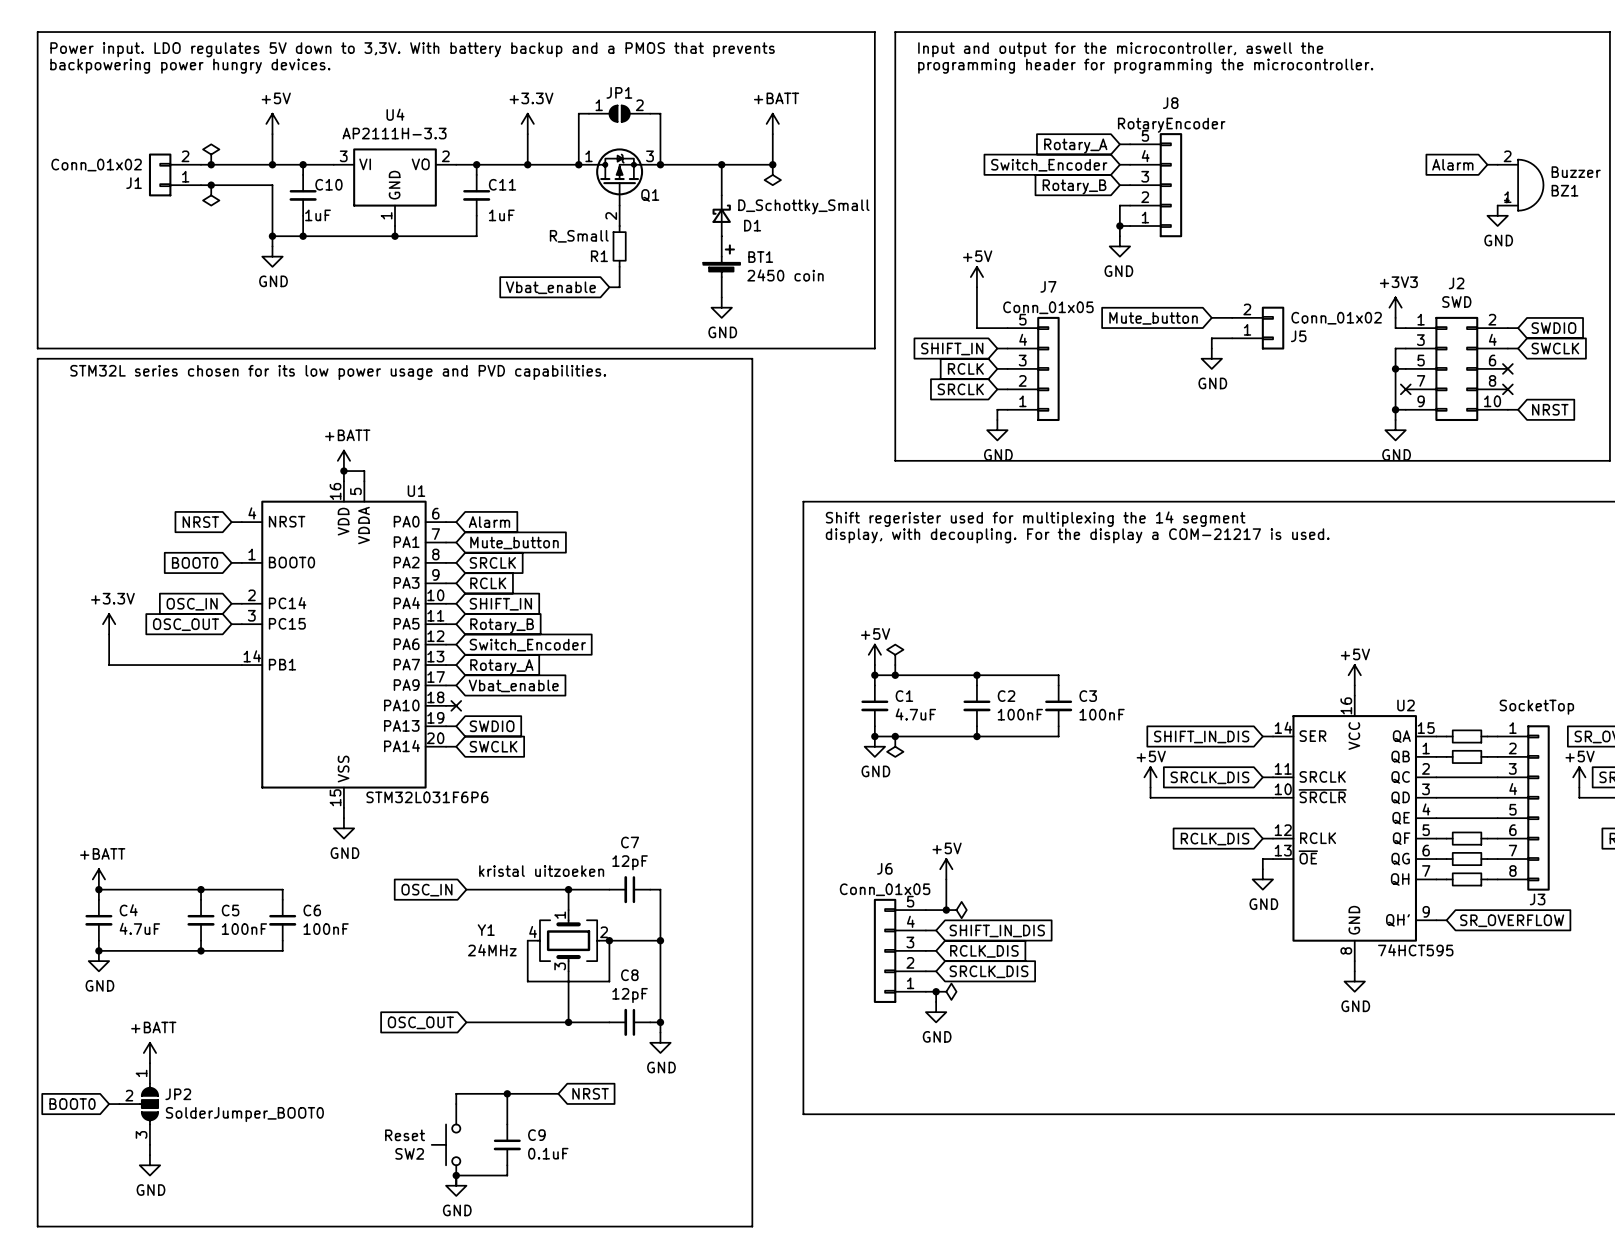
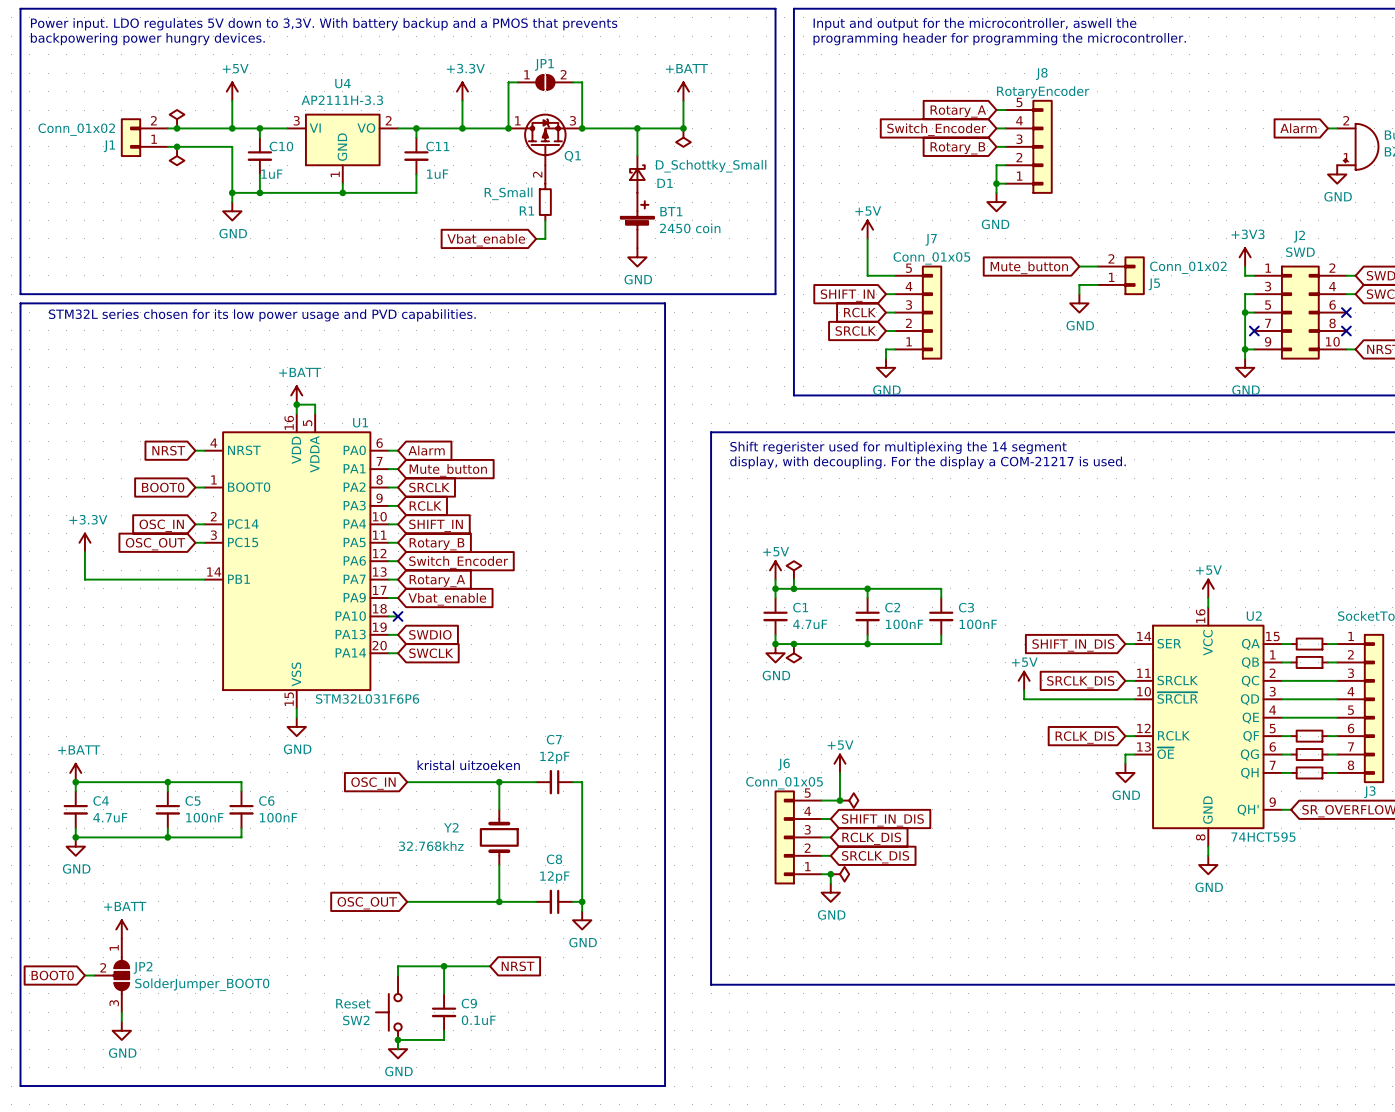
wire: (527, 940) (527, 981) (609, 981) (609, 940) (660, 940) -> none
Y1: 24MHz (568, 940) -> none
junction: (609, 940) -> none
junction: (660, 940) -> none
Y2: none -> 32.768khz (499, 837)

